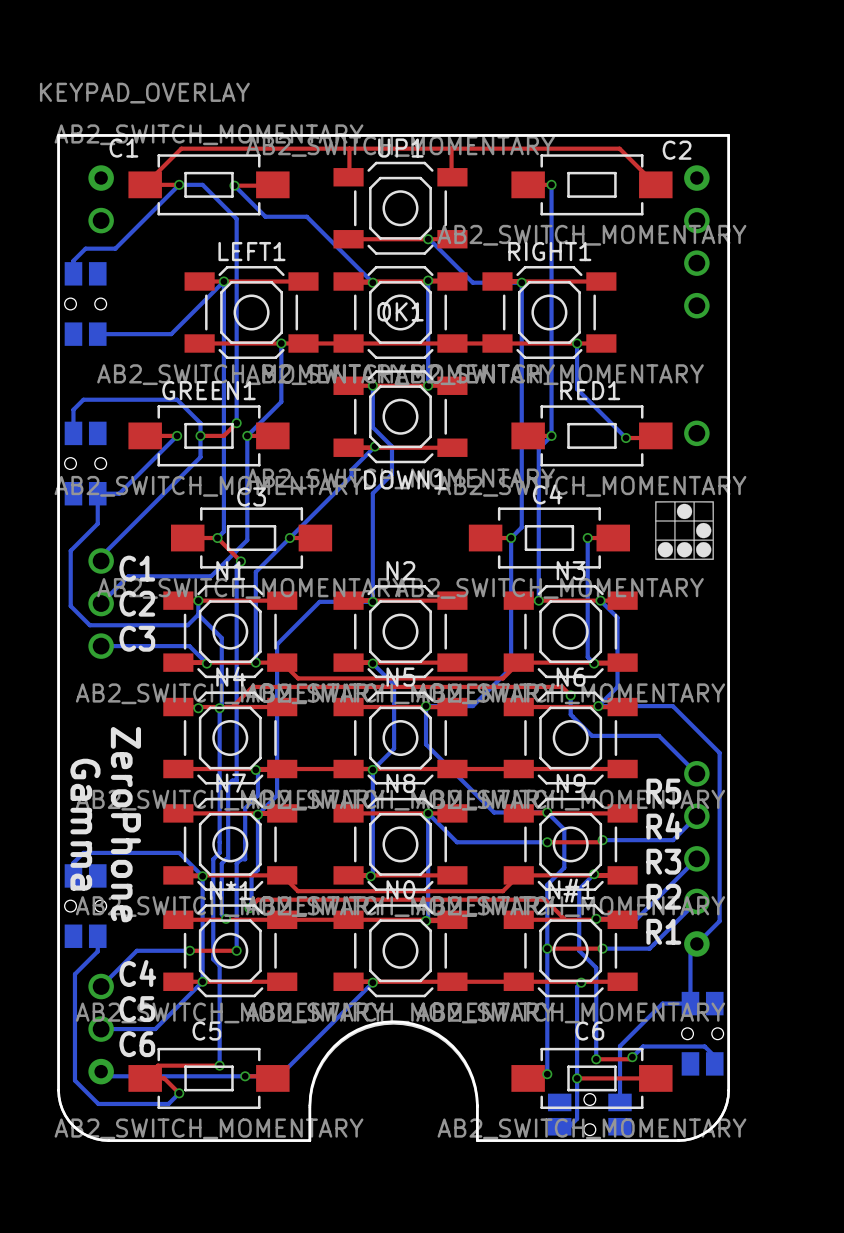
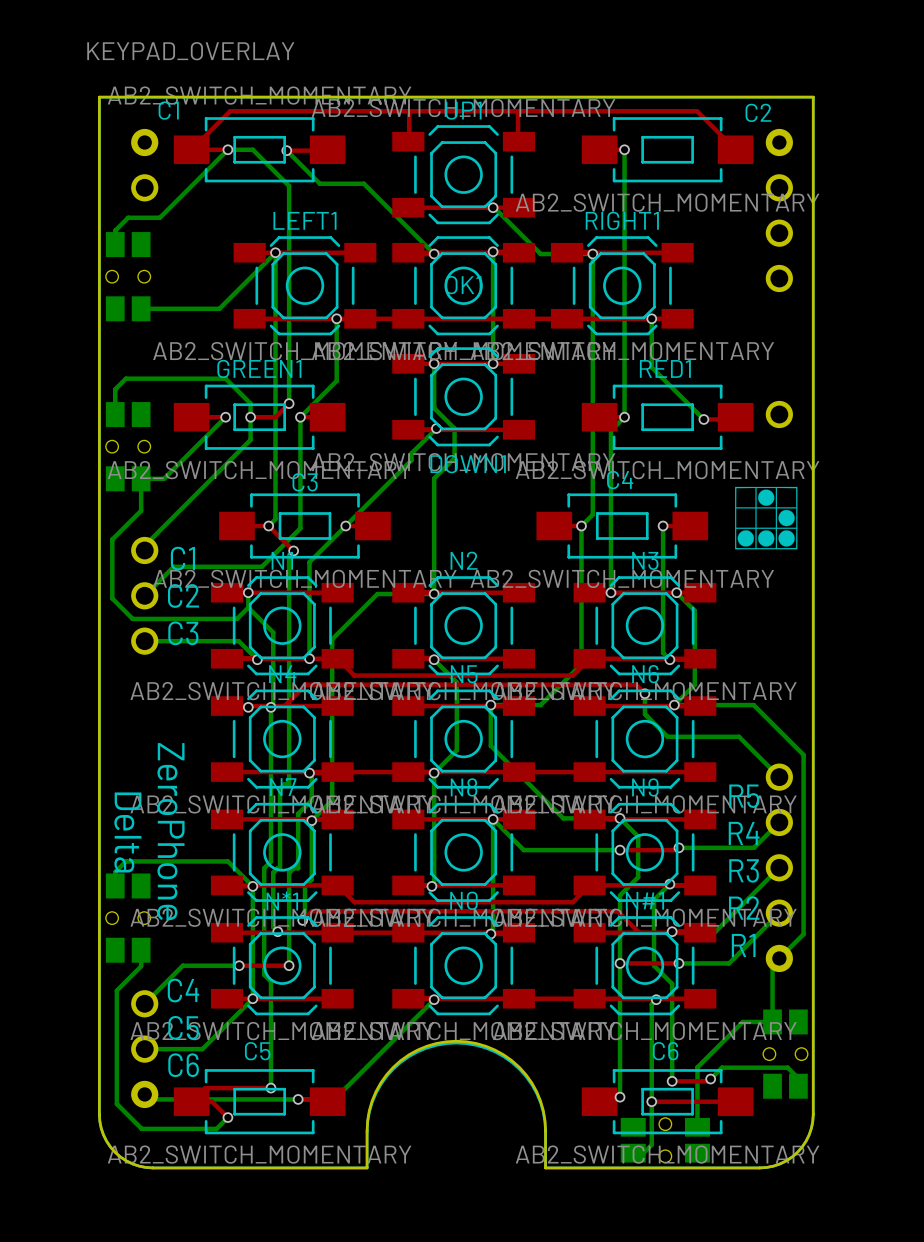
text: Gamma (85, 824) -> Delta (127, 832)

